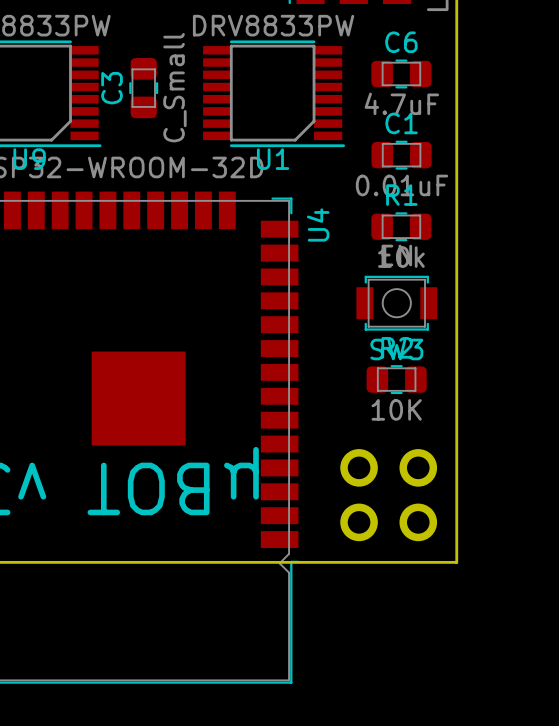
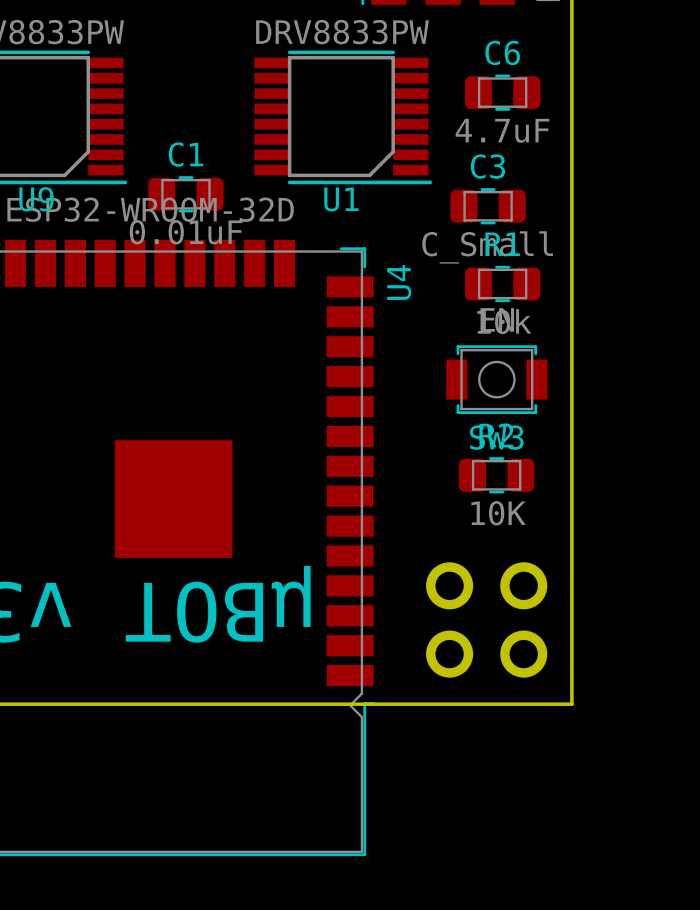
C3 rotation: 0° (143, 88) -> 90° clockwise (488, 206)
C3 position: (143, 88) -> (488, 206)
C1 position: (401, 155) -> (185, 194)

